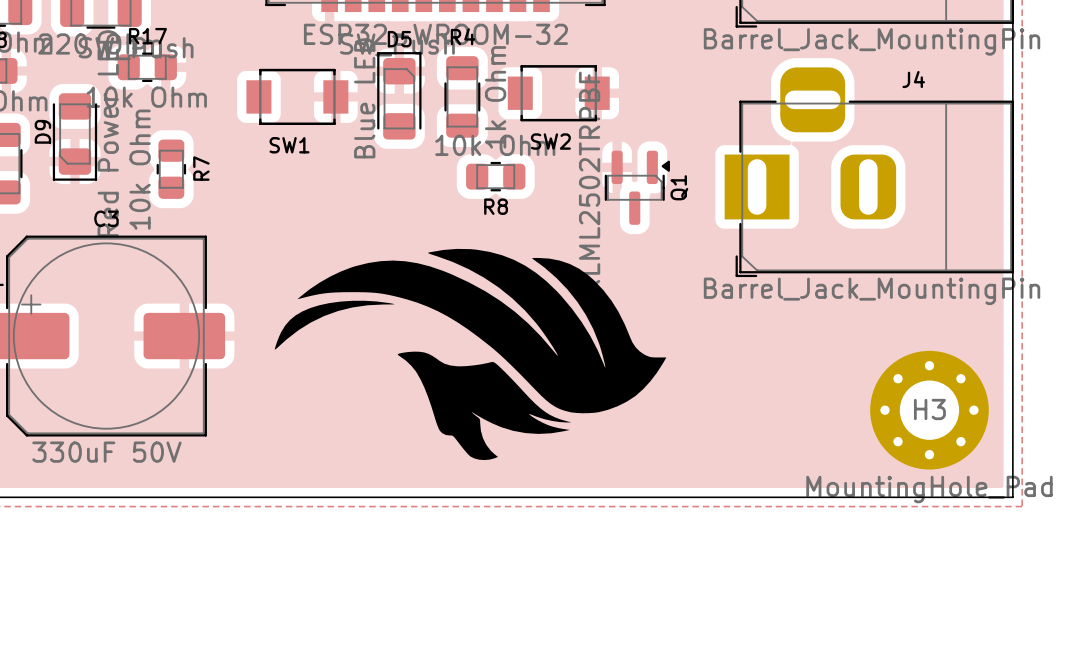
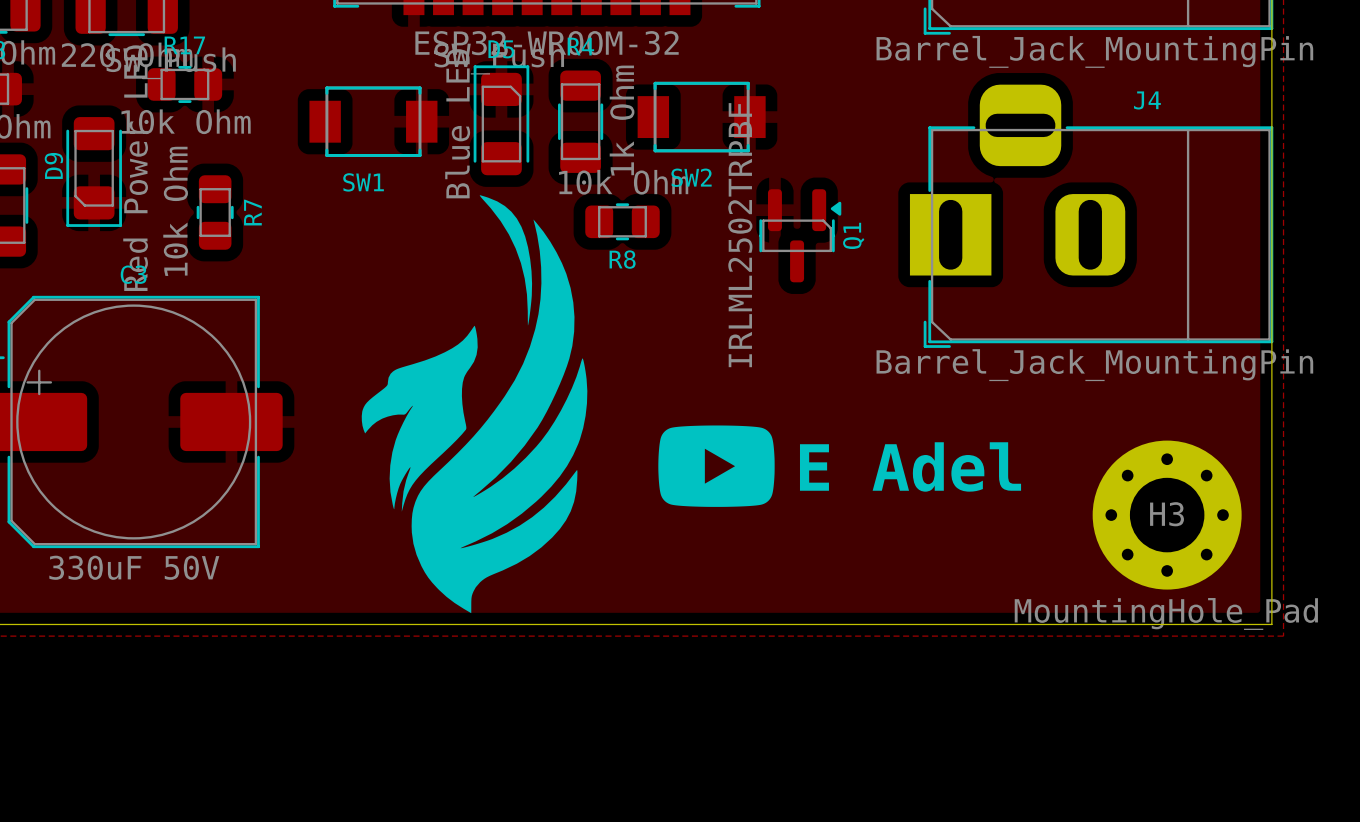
drawing: none -> [361, 195, 588, 614]
drawing: [274, 248, 667, 461] -> none
drawing: none -> [658, 425, 775, 507]
text: none -> E Adel (910, 466)

